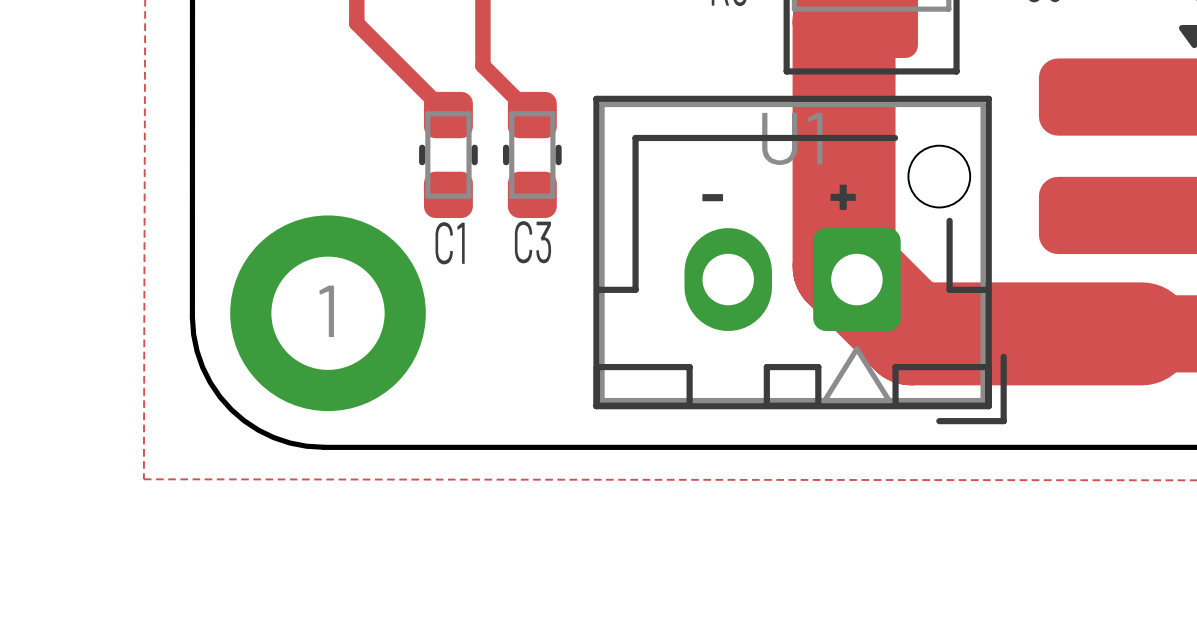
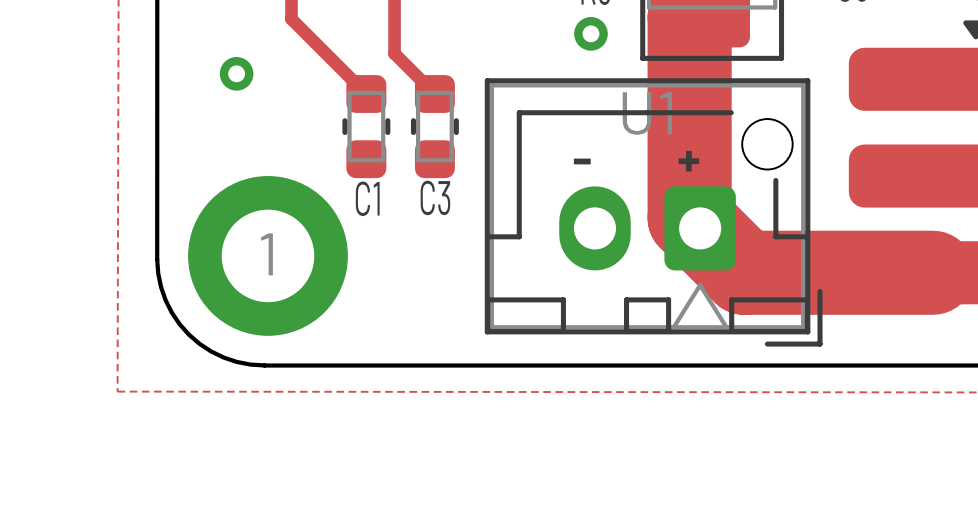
via: none -> (590, 33)
via: none -> (236, 73)

